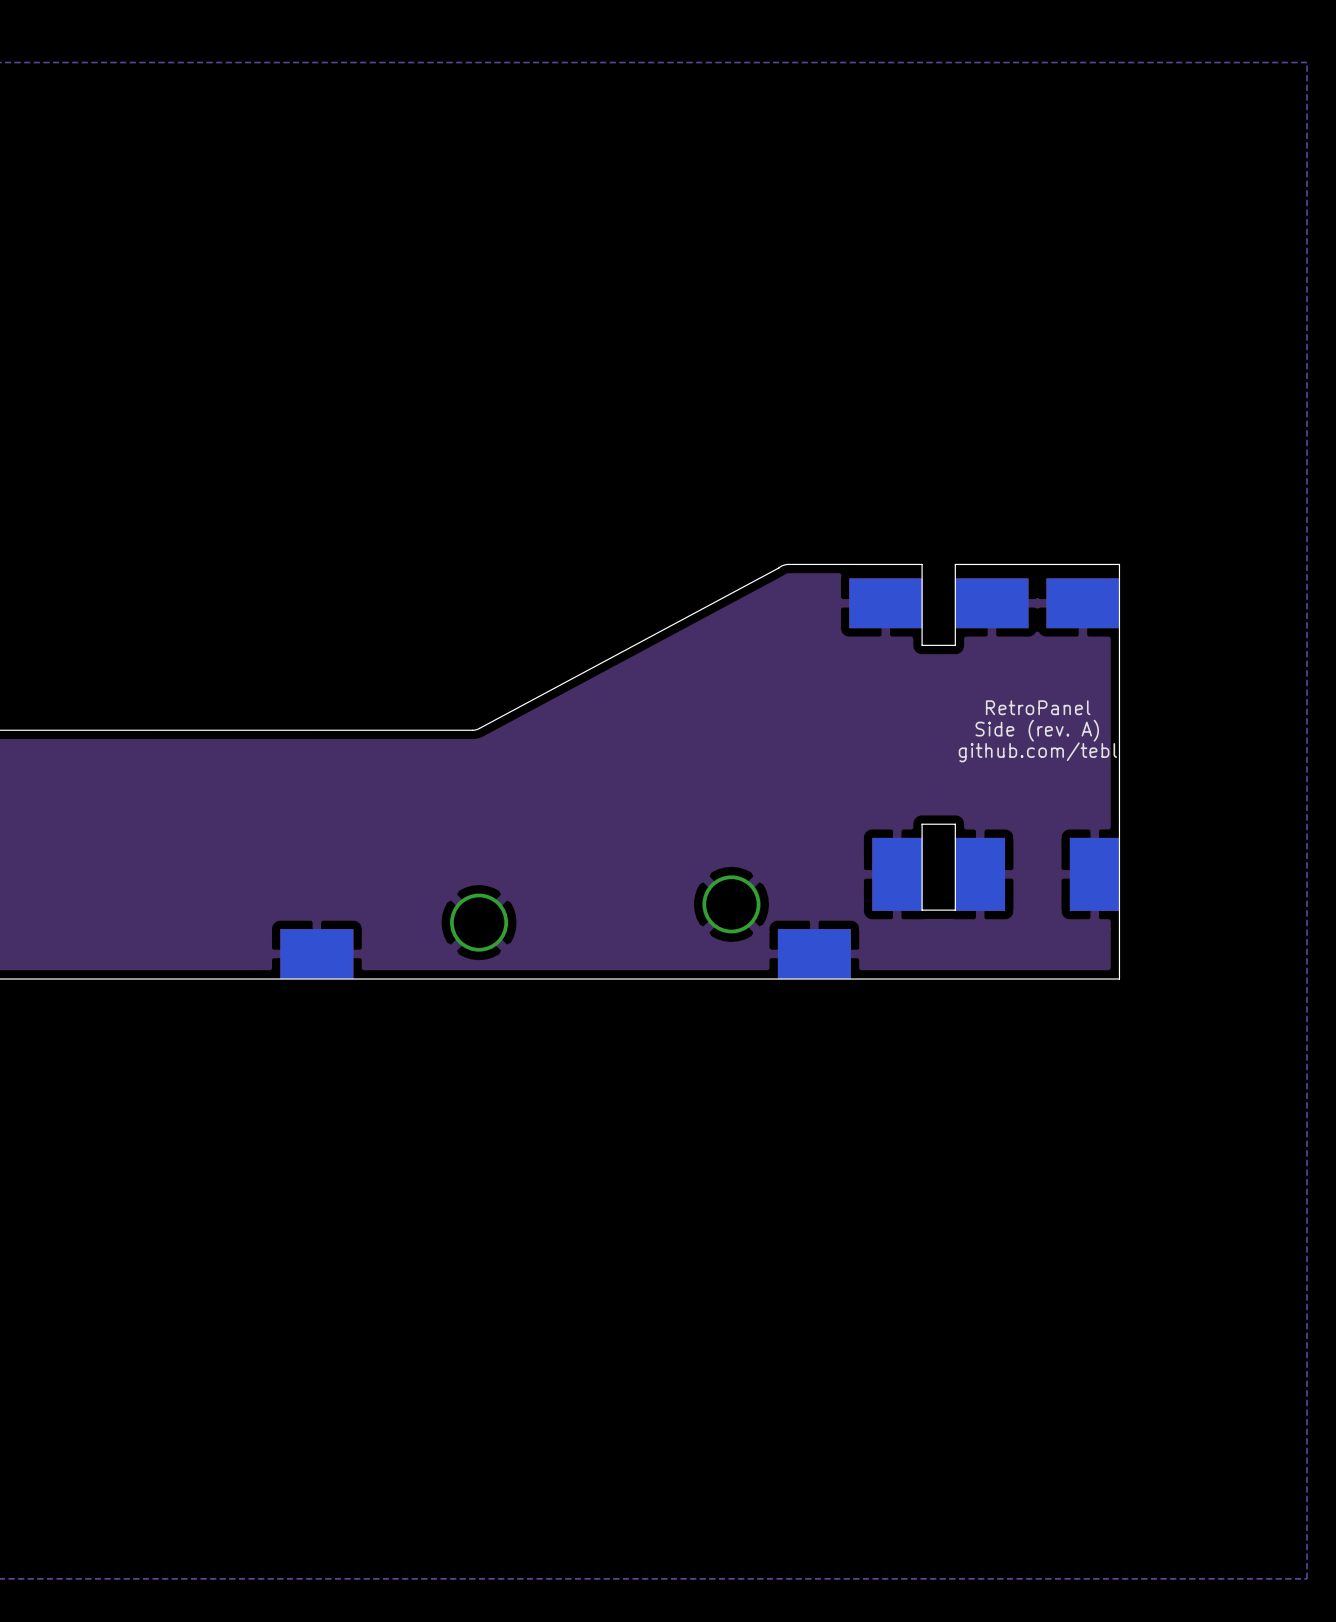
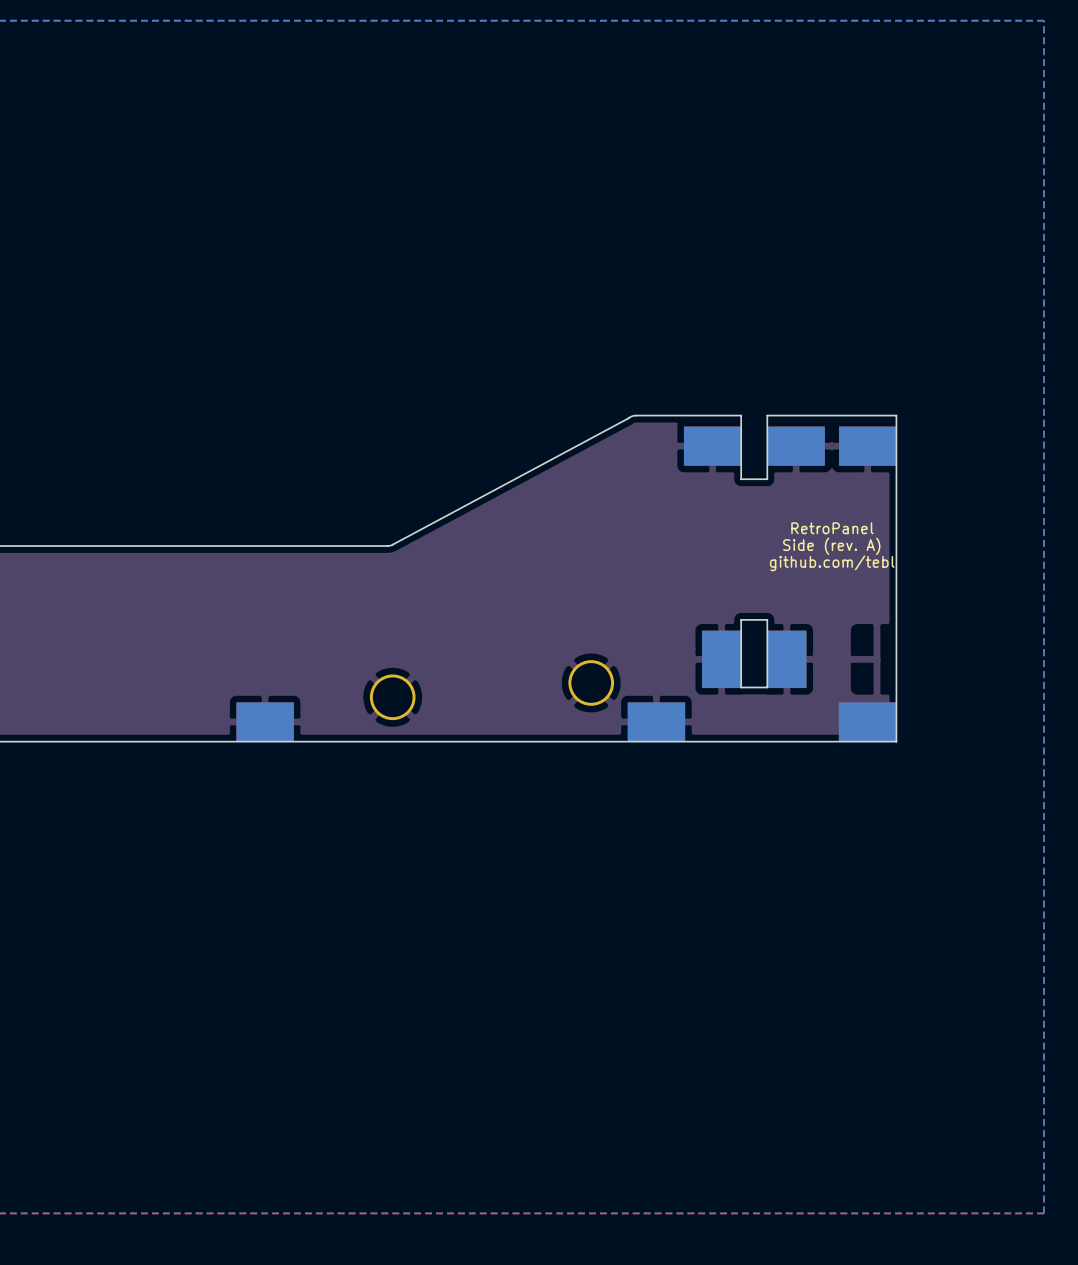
part rotation: 0° (1094, 874) -> 90° clockwise (867, 721)
part position: (1094, 874) -> (867, 721)

